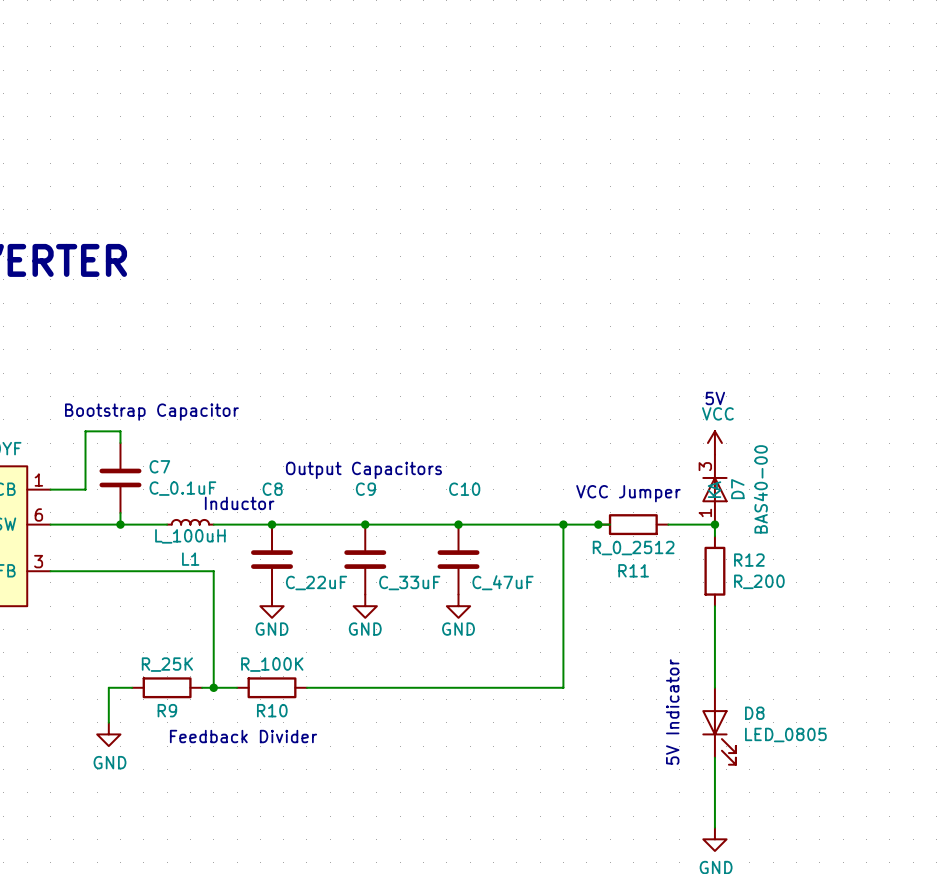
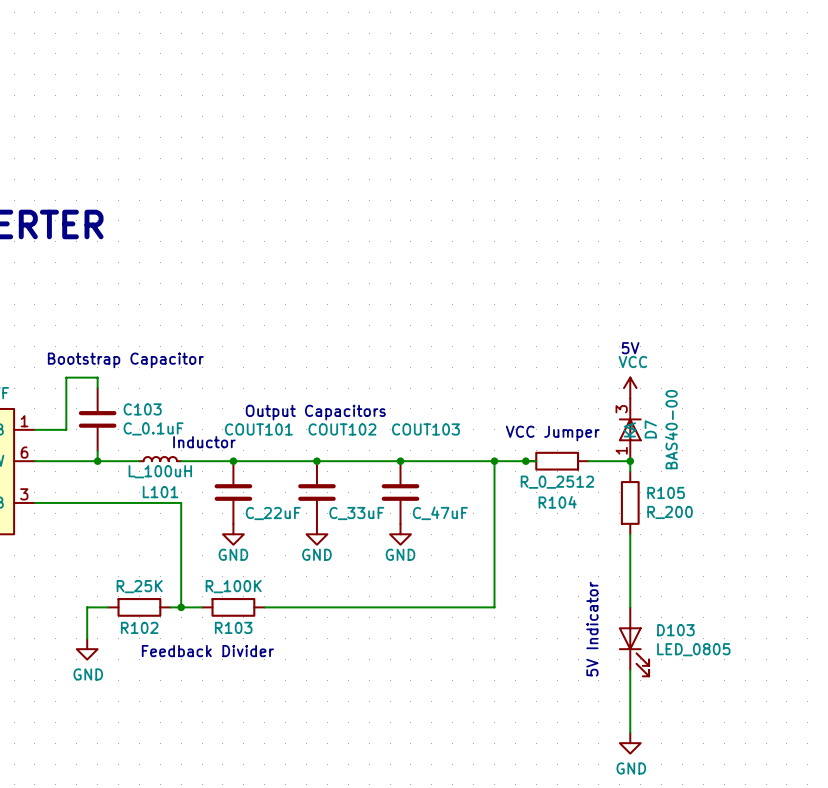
C7 name: C7 (159, 466) -> C103 (142, 409)
C8 name: C8 (272, 489) -> COUT101 (258, 429)
C9 name: C9 (365, 489) -> COUT102 (342, 429)
C10 name: C10 (464, 489) -> COUT103 (425, 429)
L1 name: L1 (190, 559) -> L101 (160, 492)
R12 name: R12 (749, 560) -> R105 (666, 492)
R11 name: R11 (633, 570) -> R104 (557, 502)
R9 name: R9 (167, 710) -> R102 (139, 627)
R10 name: R10 (272, 710) -> R103 (233, 627)
D8 name: D8 (754, 713) -> D103 (675, 630)

